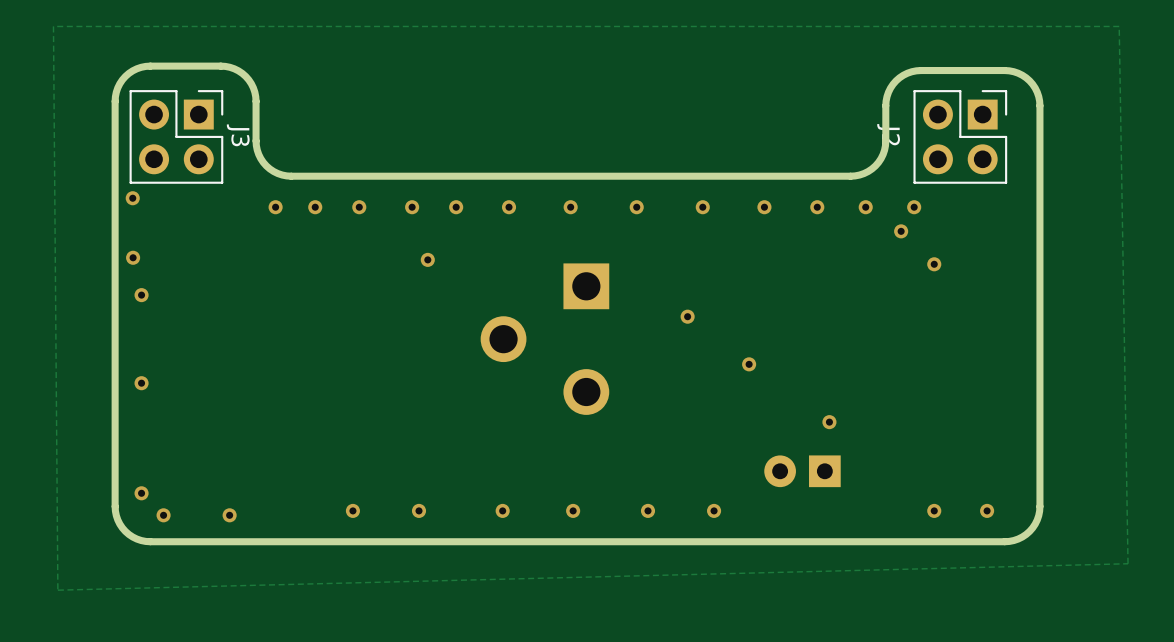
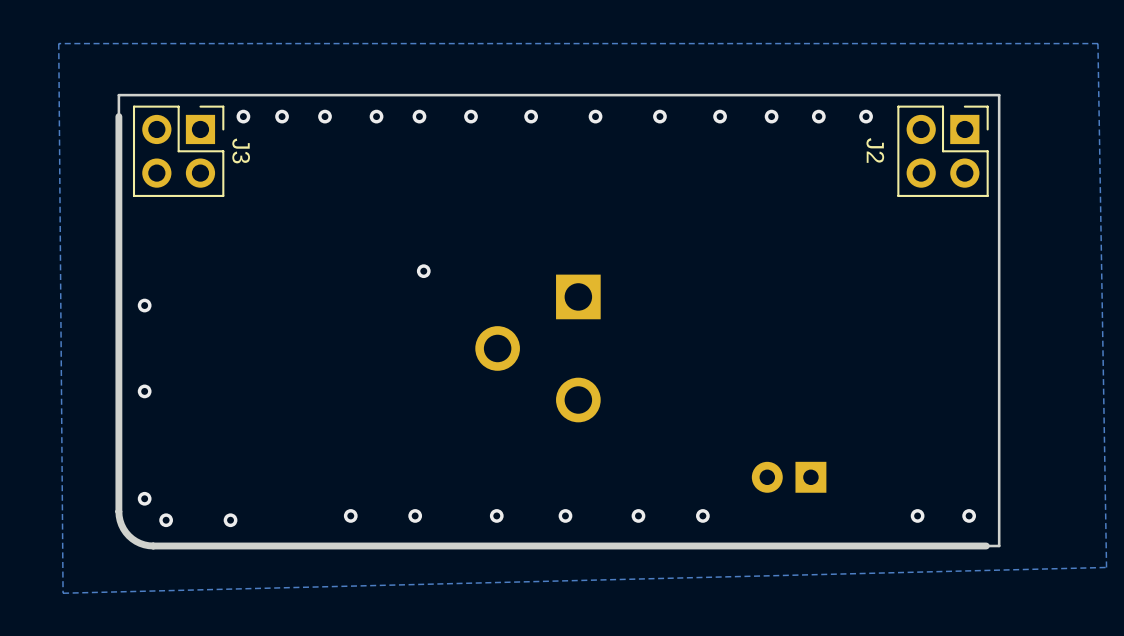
board edge: (115, 101) (117, 87) (122, 79) (128, 73) (141, 67) (220, 66) (234, 68) (245, 76) (254, 92) (256, 140) (258, 154) (269, 168) (286, 175) (850, 176) (868, 171) (881, 158) (885, 145) (887, 96) (893, 84) (903, 75) (921, 70) (1004, 70) (1022, 75) (1035, 88) (1039, 105) (1039, 506) (1037, 519) (1029, 531) (1018, 539) (1004, 541) -> (118, 116) (118, 95) (999, 95) (999, 546) (986, 546)
via: none -> (243, 116)
via: none -> (282, 116)
via: none -> (325, 116)
via: none -> (376, 116)
via: none -> (419, 116)
via: none -> (471, 116)
via: none -> (531, 116)
via: none -> (595, 116)
via: none -> (659, 116)
via: none -> (720, 116)
via: none -> (771, 116)
via: none -> (818, 116)
via: none -> (866, 116)
via: (132, 198) -> none
via: (275, 207) -> none
via: (315, 207) -> none
via: (359, 207) -> none
via: (412, 207) -> none
via: (456, 207) -> none
via: (509, 207) -> none
via: (570, 207) -> none
via: (636, 207) -> none
via: (702, 207) -> none
via: (764, 207) -> none
via: (817, 207) -> none
via: (865, 207) -> none
via: (914, 207) -> none
via: (901, 231) -> none
via: (133, 257) -> none
via: (934, 264) -> none
via: (687, 316) -> none
via: (749, 364) -> none
via: (829, 422) -> none

